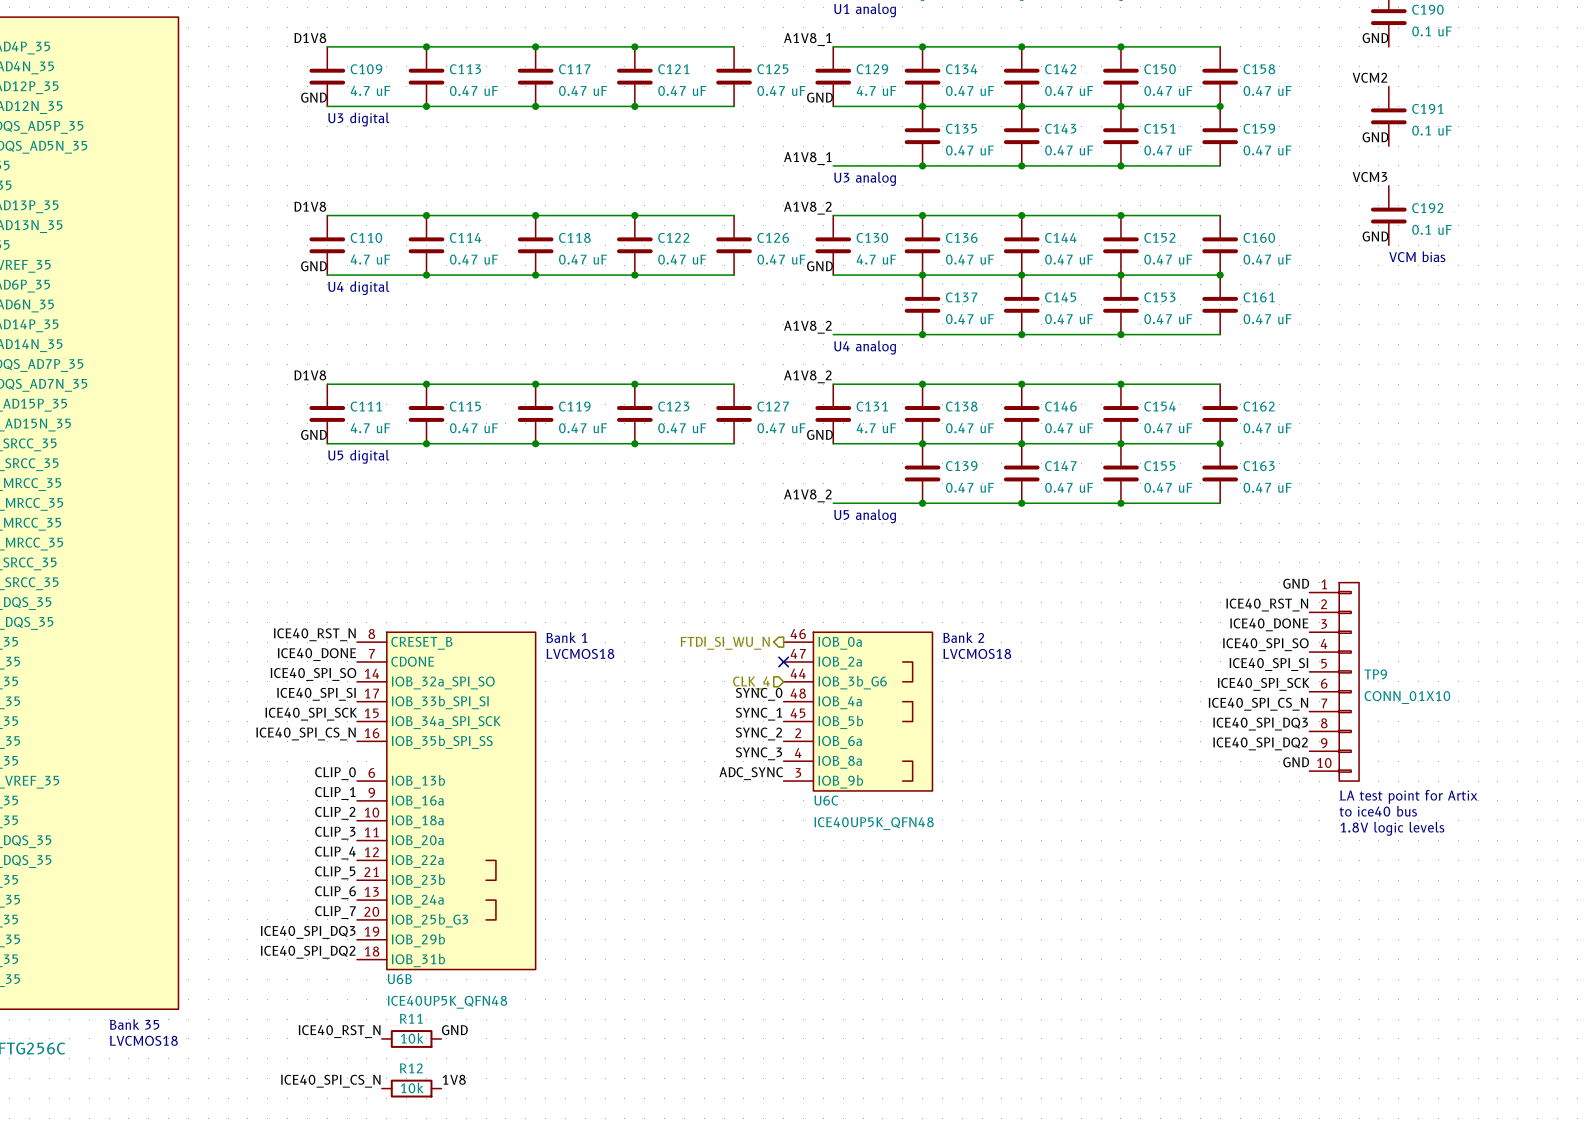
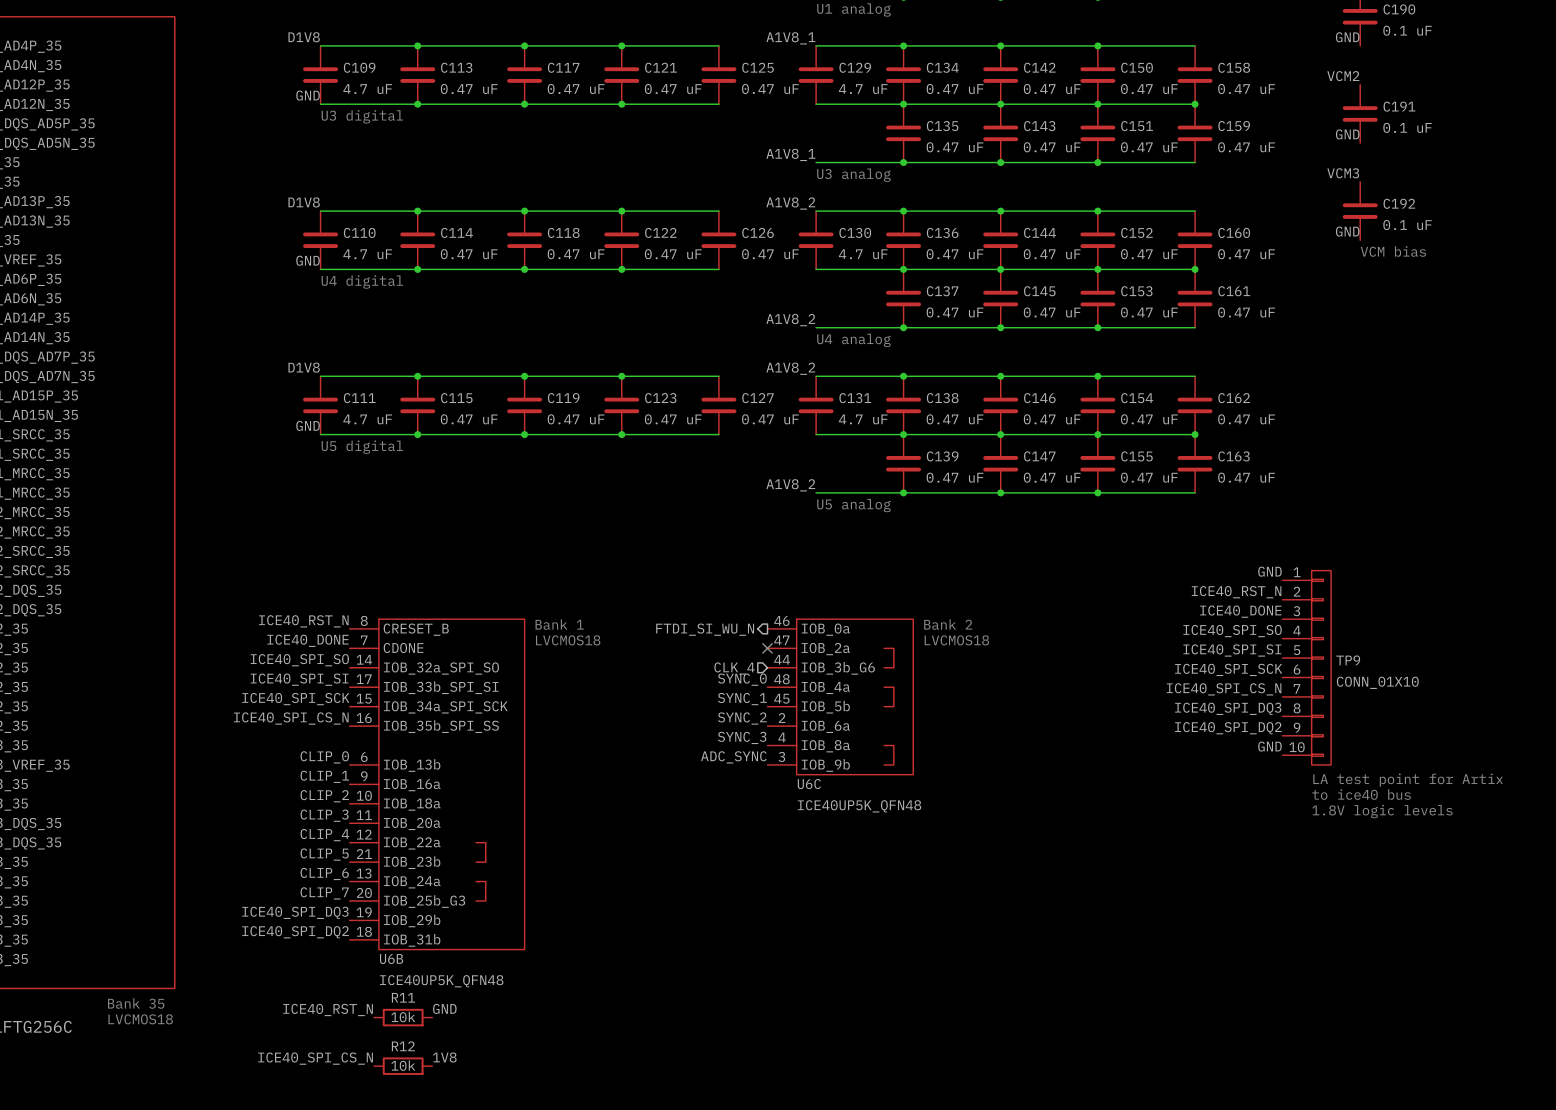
label: GND (819, 97) -> none
label: GND (819, 266) -> none
label: GND (819, 434) -> none

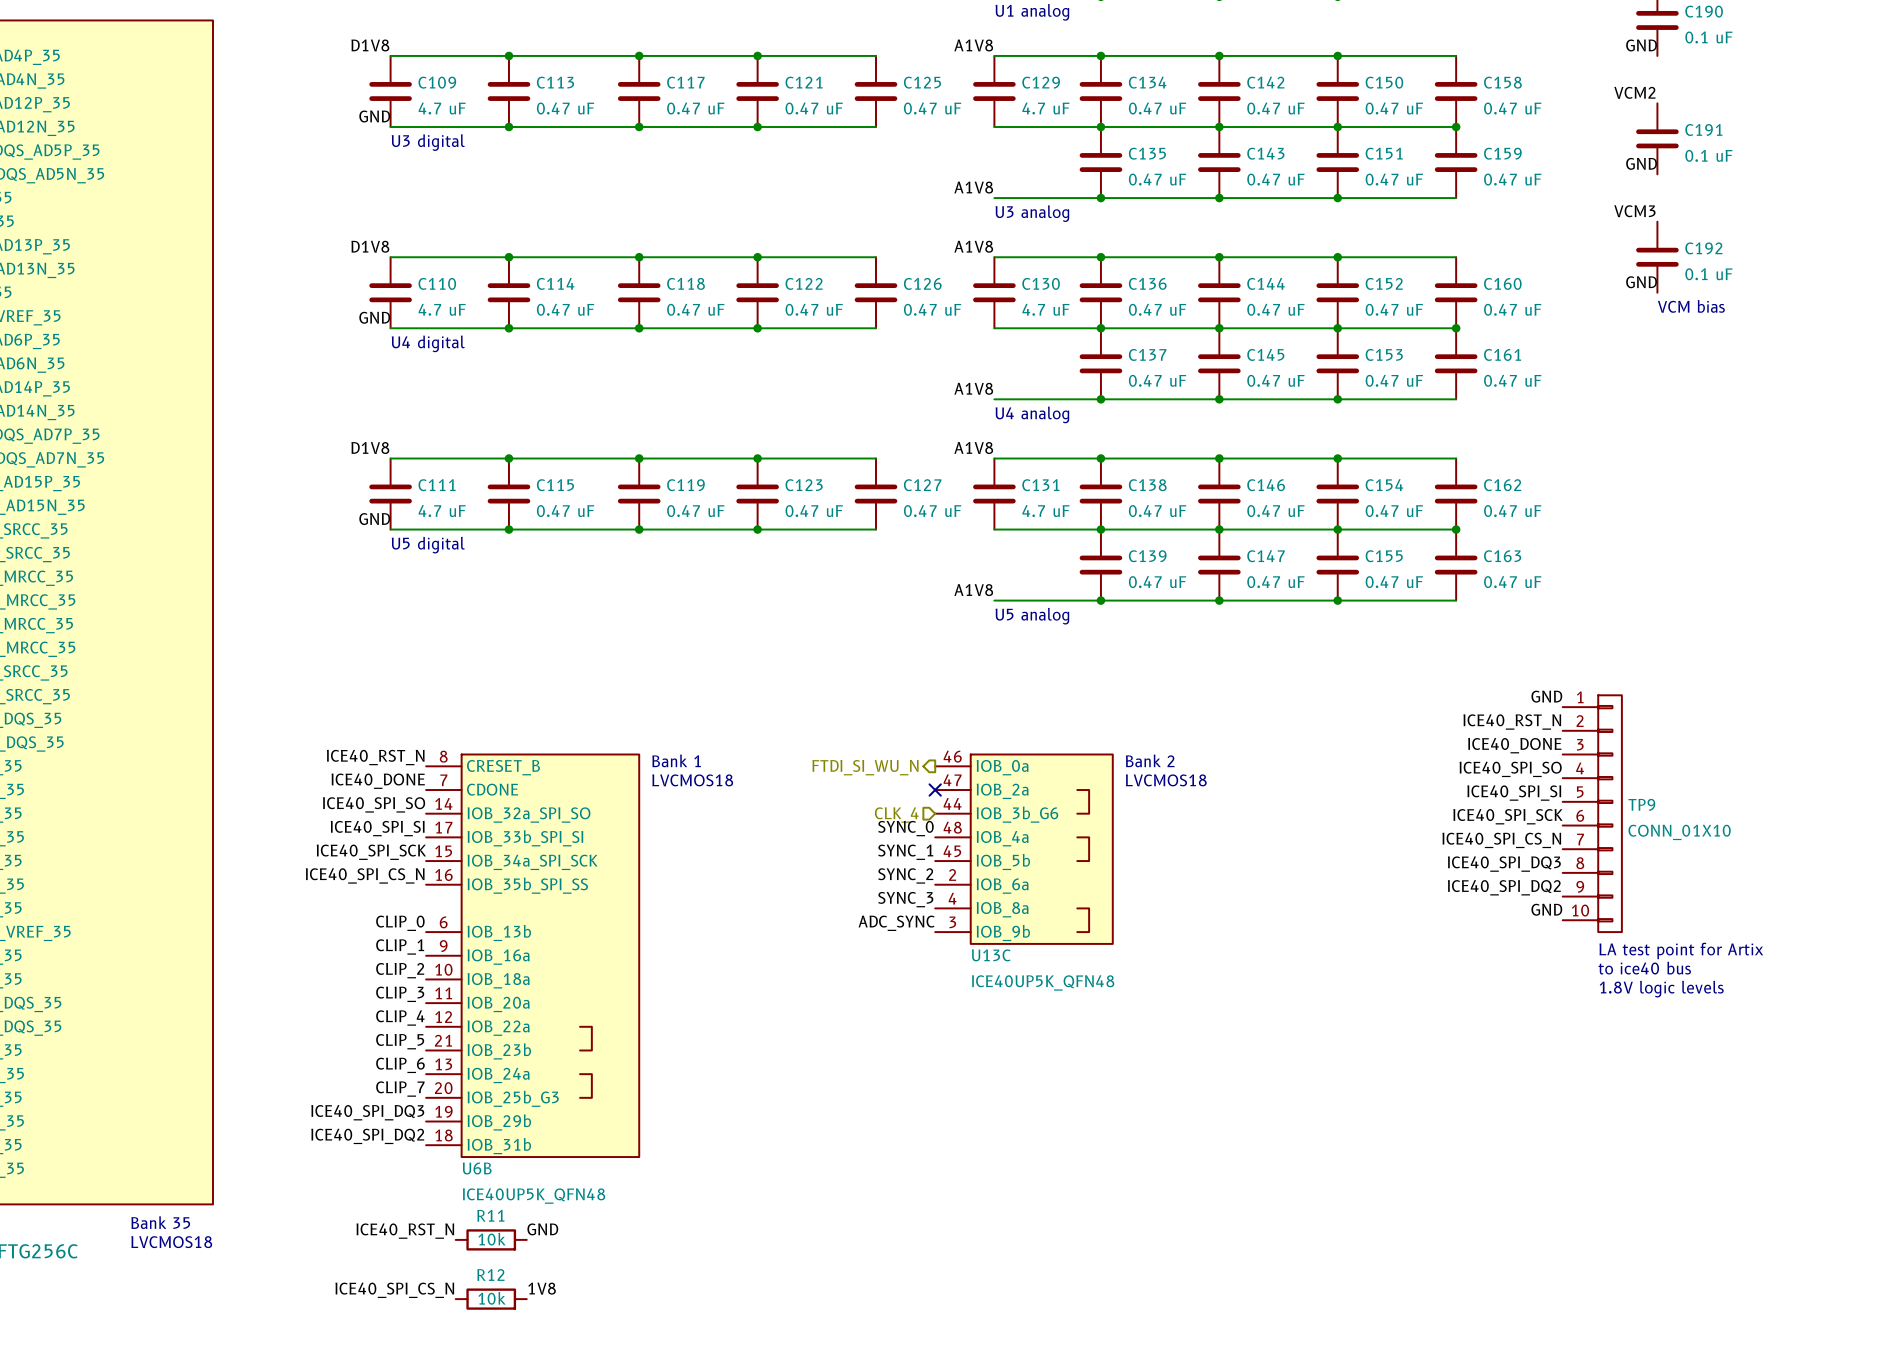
label: A1V8_1 (790, 38) -> A1V8 (973, 45)
label: A1V8_1 (790, 154) -> A1V8 (973, 187)
label: A1V8_2 (790, 203) -> A1V8 (973, 246)
label: A1V8_2 (790, 320) -> A1V8 (973, 388)
label: A1V8_2 (790, 368) -> A1V8 (973, 448)
label: A1V8_2 (790, 485) -> A1V8 (973, 590)
U6C name: U6C (809, 784) -> U13C (991, 955)

